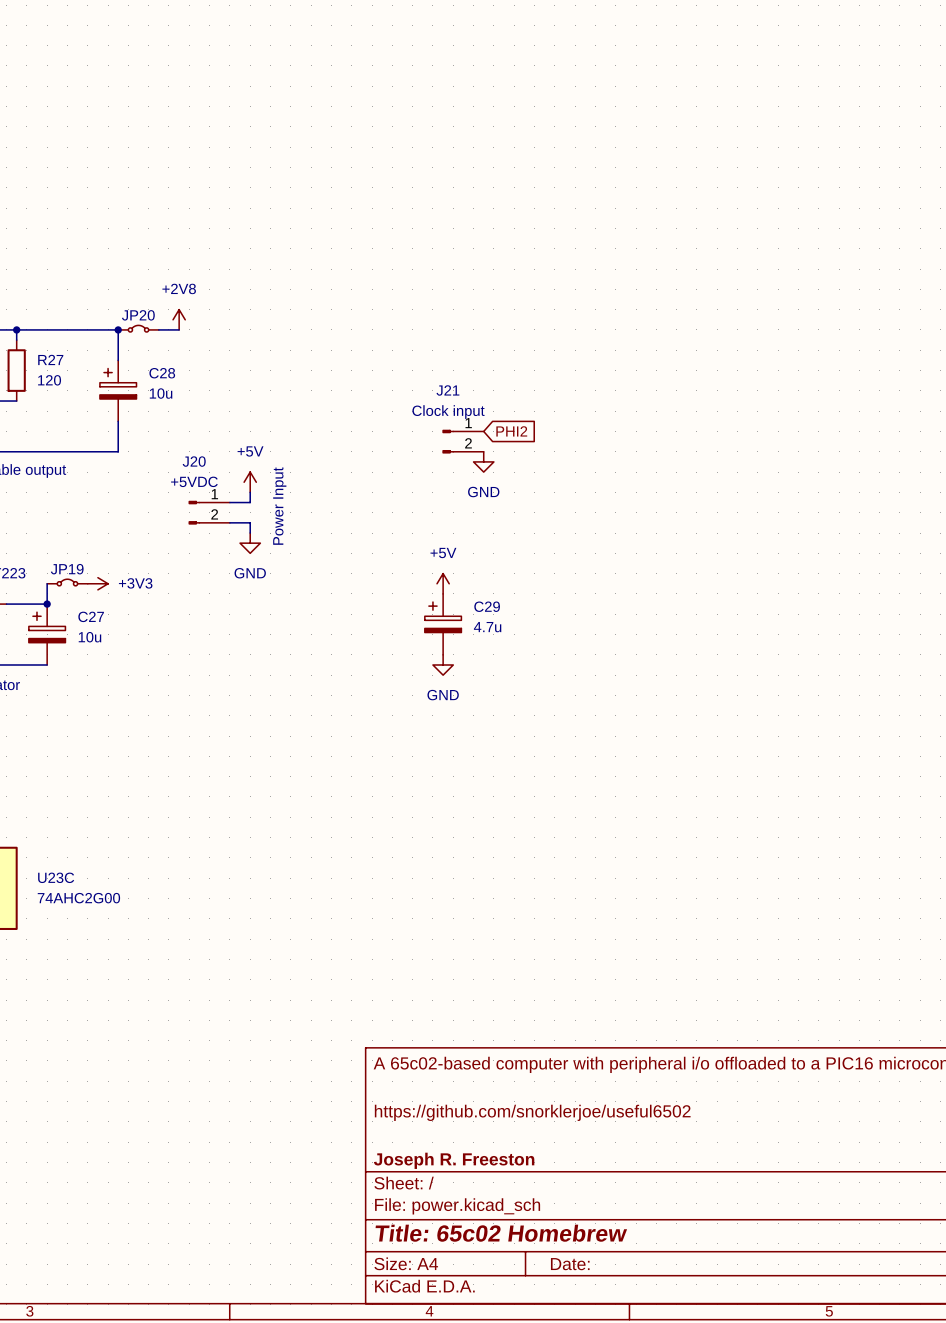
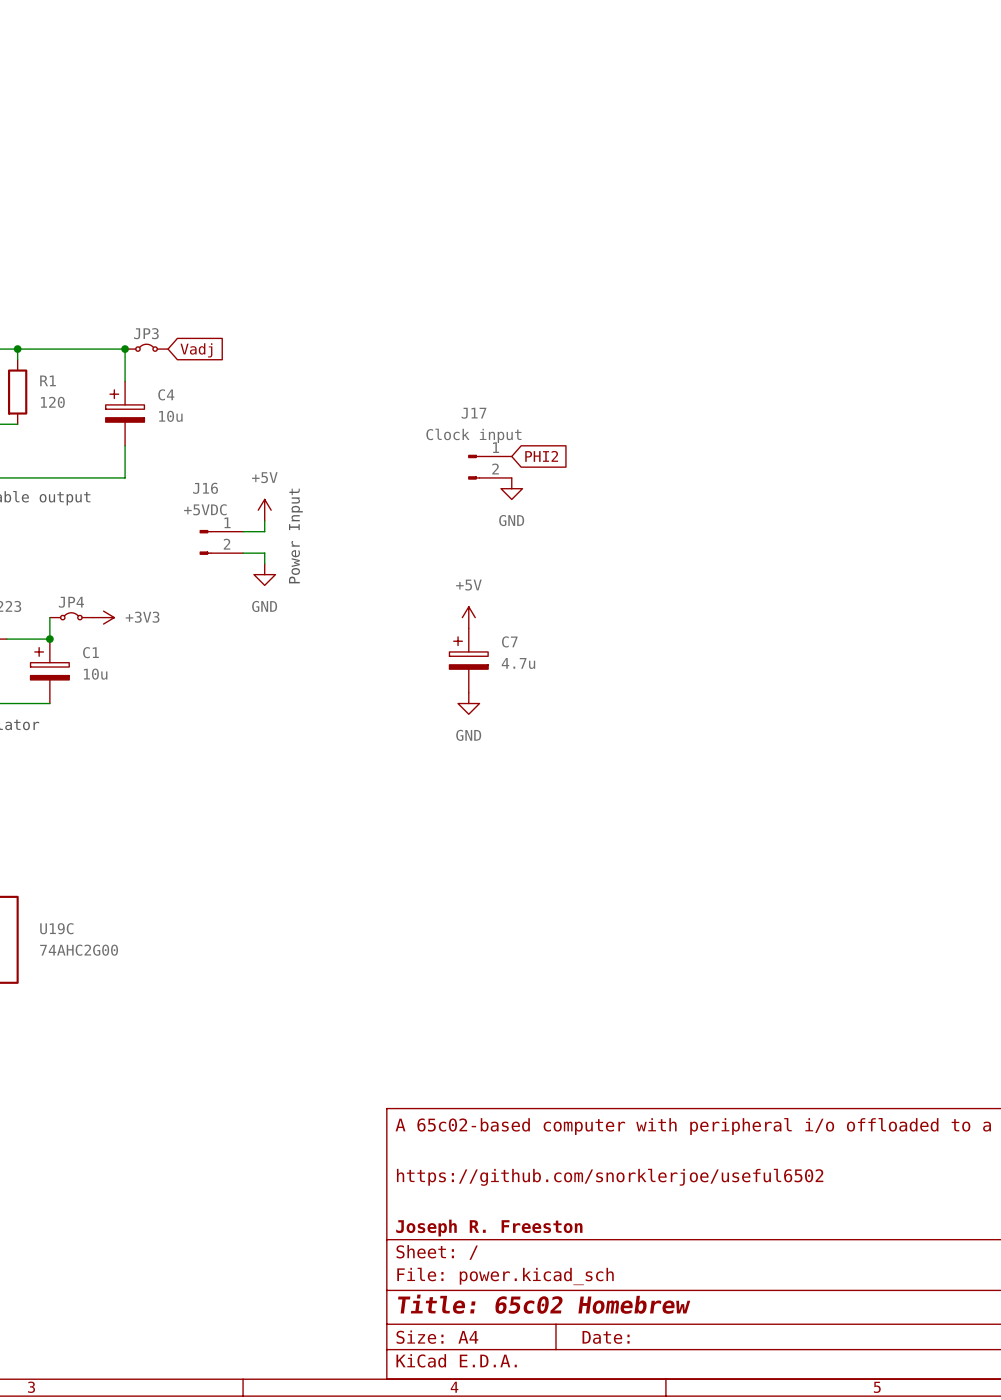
JP20 name: JP20 (138, 315) -> JP3 (146, 333)
power symbol: +2V8 (179, 319) -> none
wire: (158, 329) (179, 329) -> none
global label: none -> Vadj (196, 350)
R27 name: R27 (50, 359) -> R1 (48, 380)
C28 name: C28 (162, 373) -> C4 (166, 394)
J21 name: J21 (447, 390) -> J17 (473, 413)
J20 name: J20 (194, 461) -> J16 (205, 488)
JP19 name: JP19 (67, 569) -> JP4 (71, 602)
C29 name: C29 (487, 606) -> C7 (509, 641)
C27 name: C27 (91, 616) -> C1 (90, 652)
U23C name: U23C (56, 877) -> U19C (56, 928)

